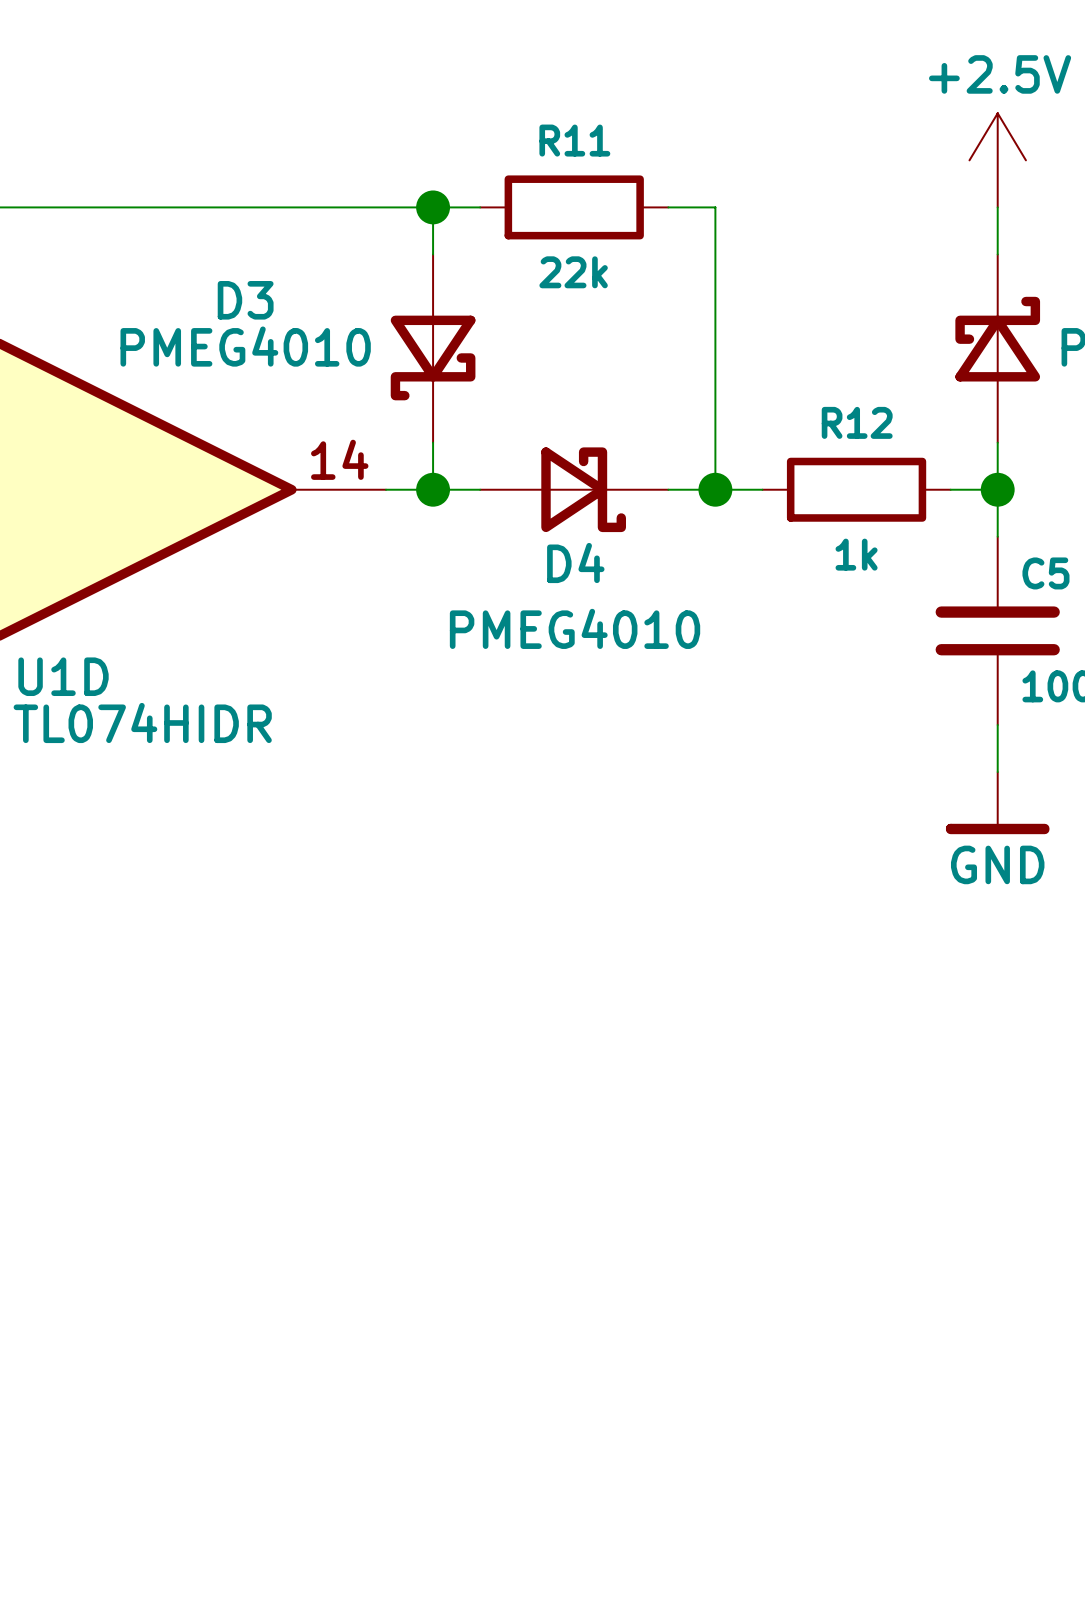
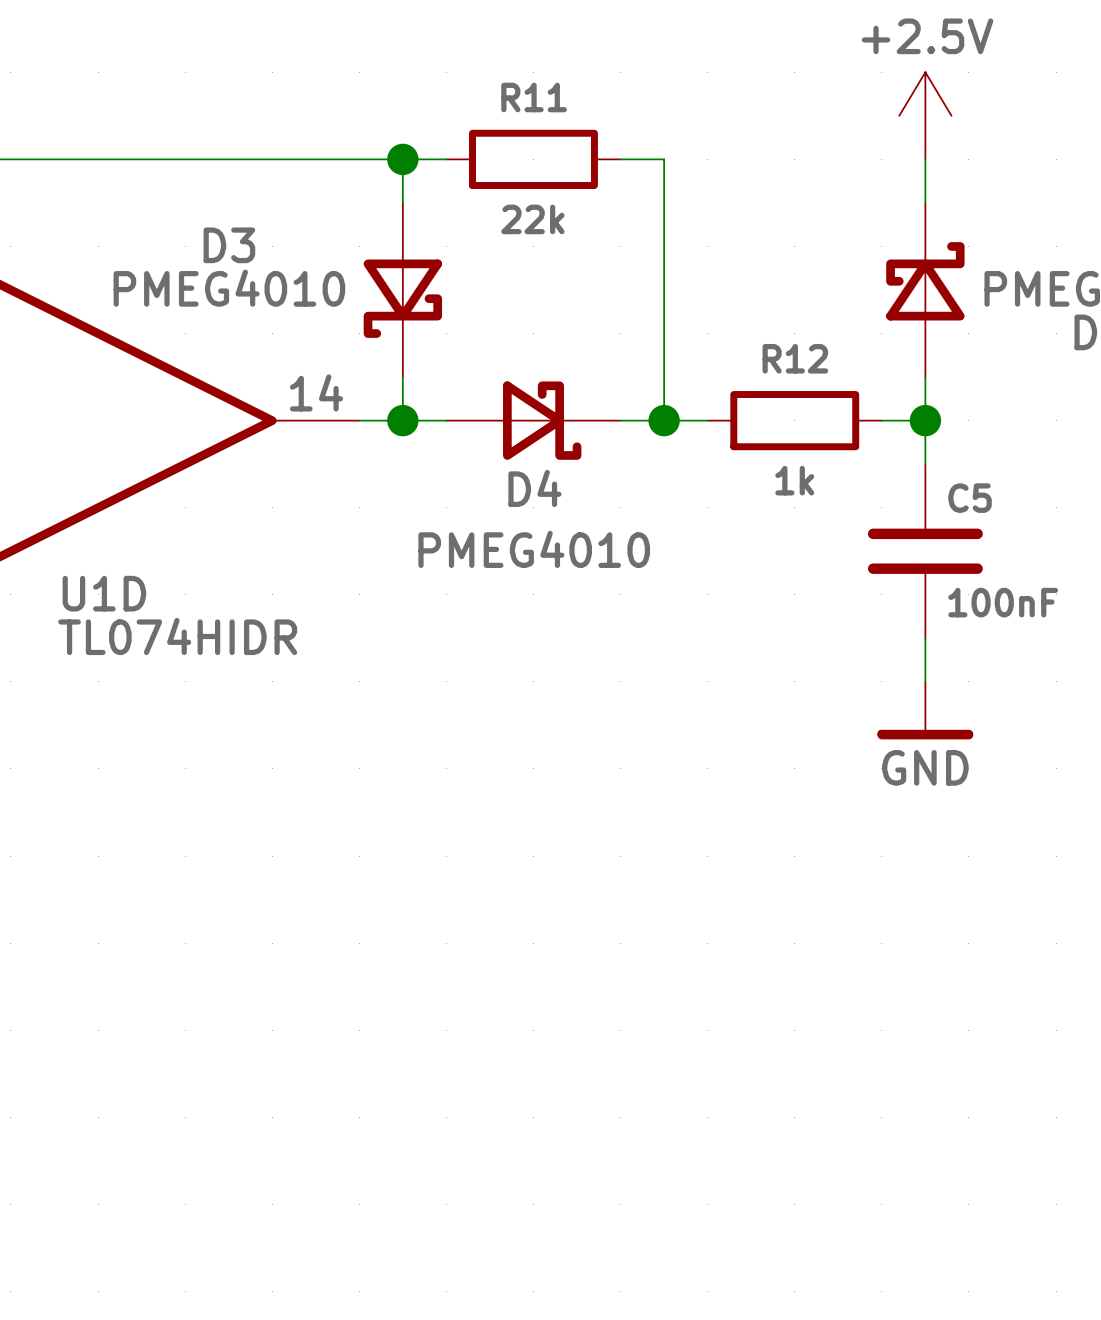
U1D name position: U1D (63, 676) -> U1D (104, 593)
U1D value position: TL074HIDR (142, 722) -> TL074HIDR (177, 636)

